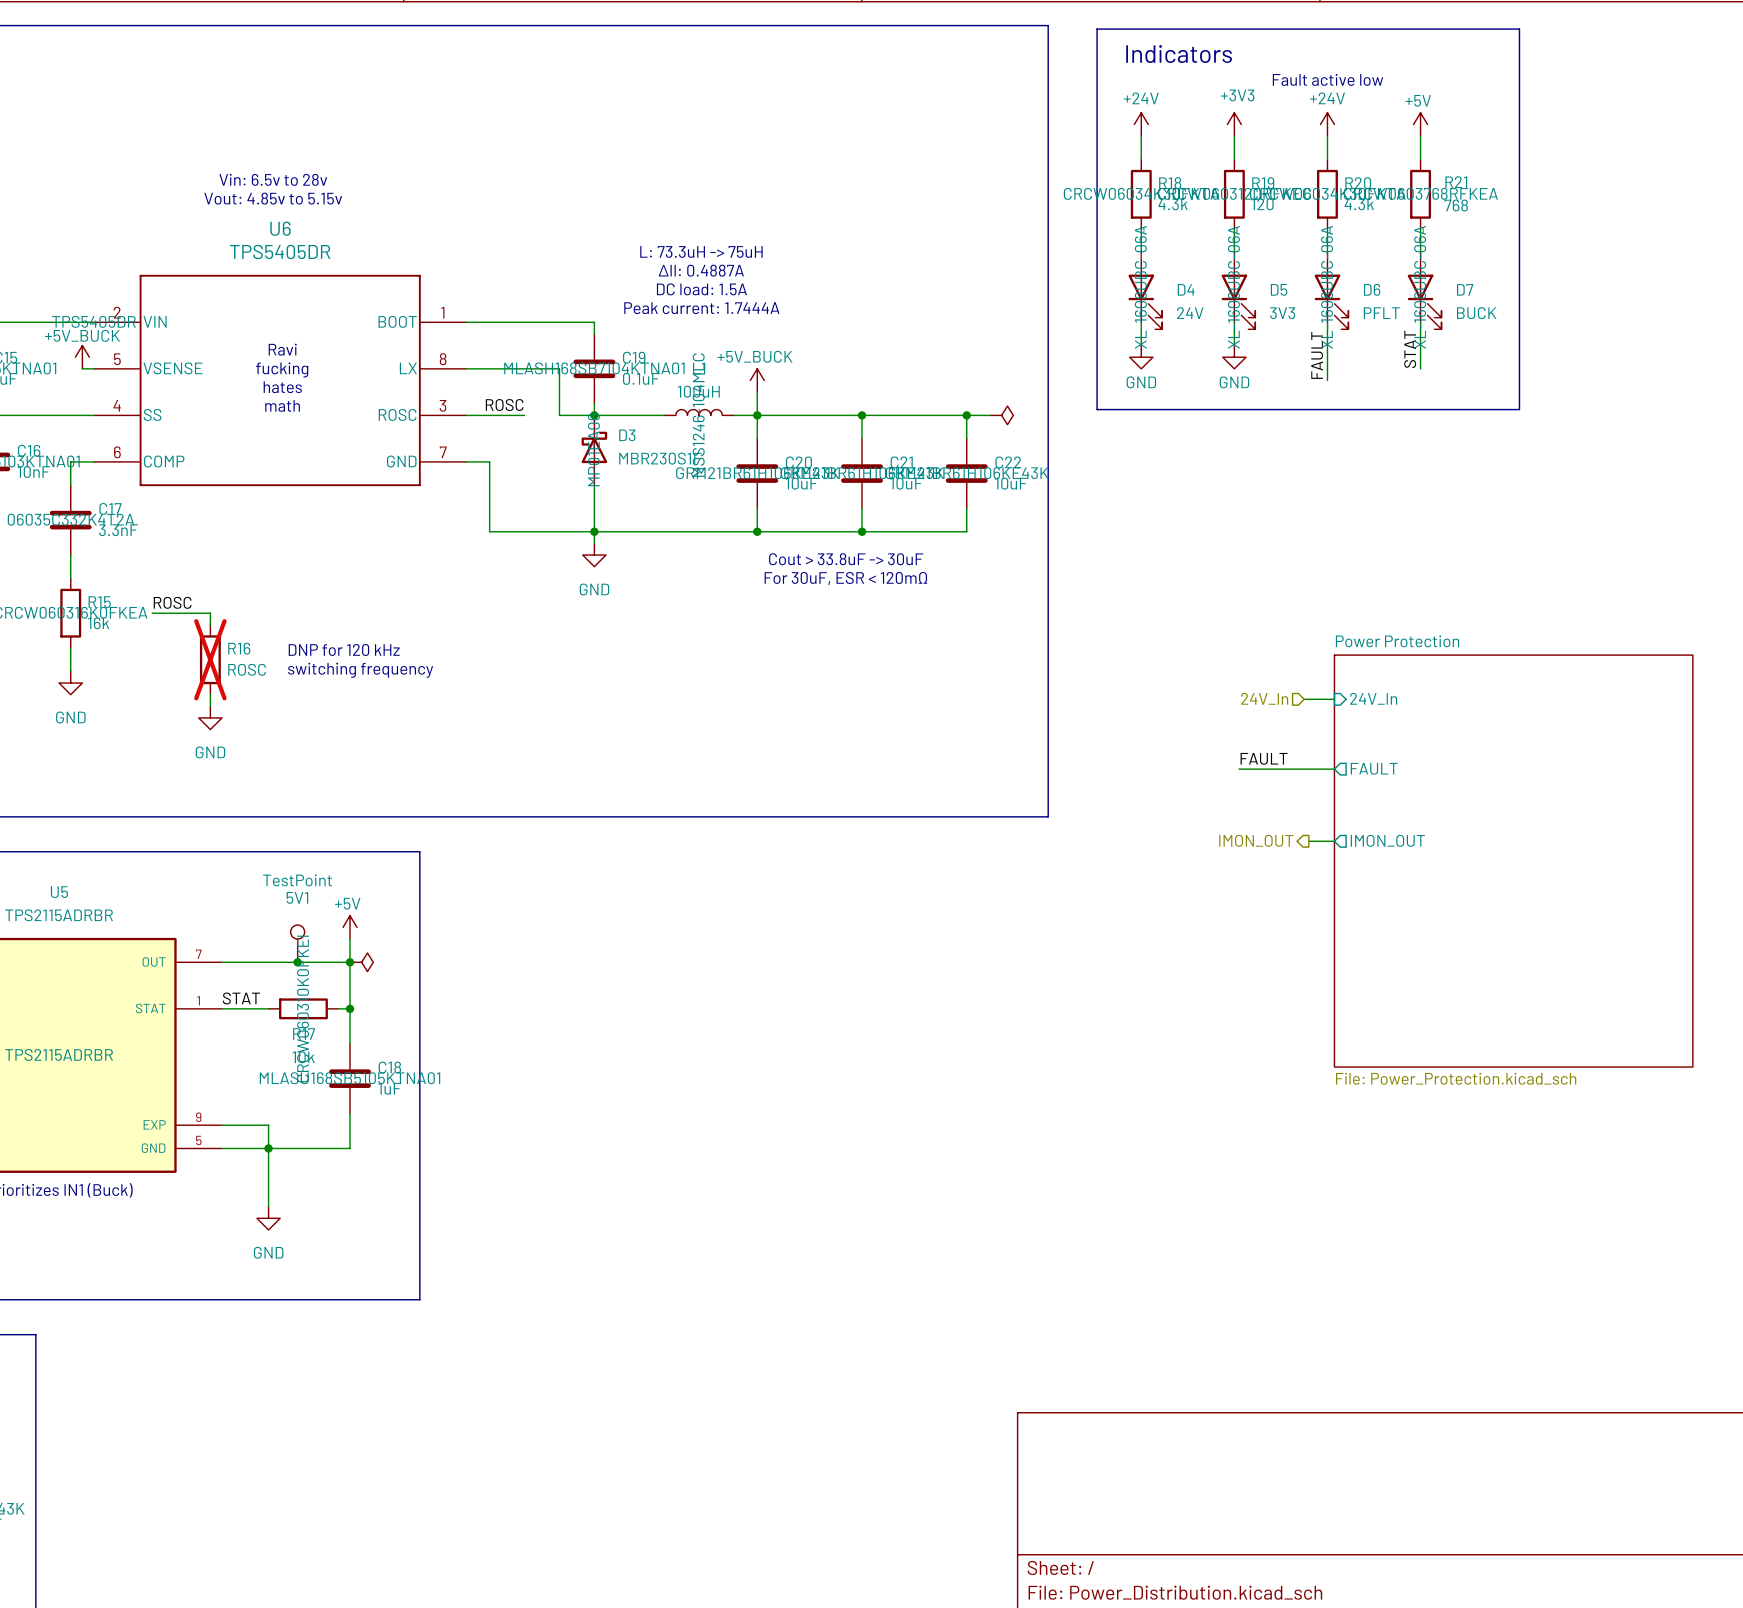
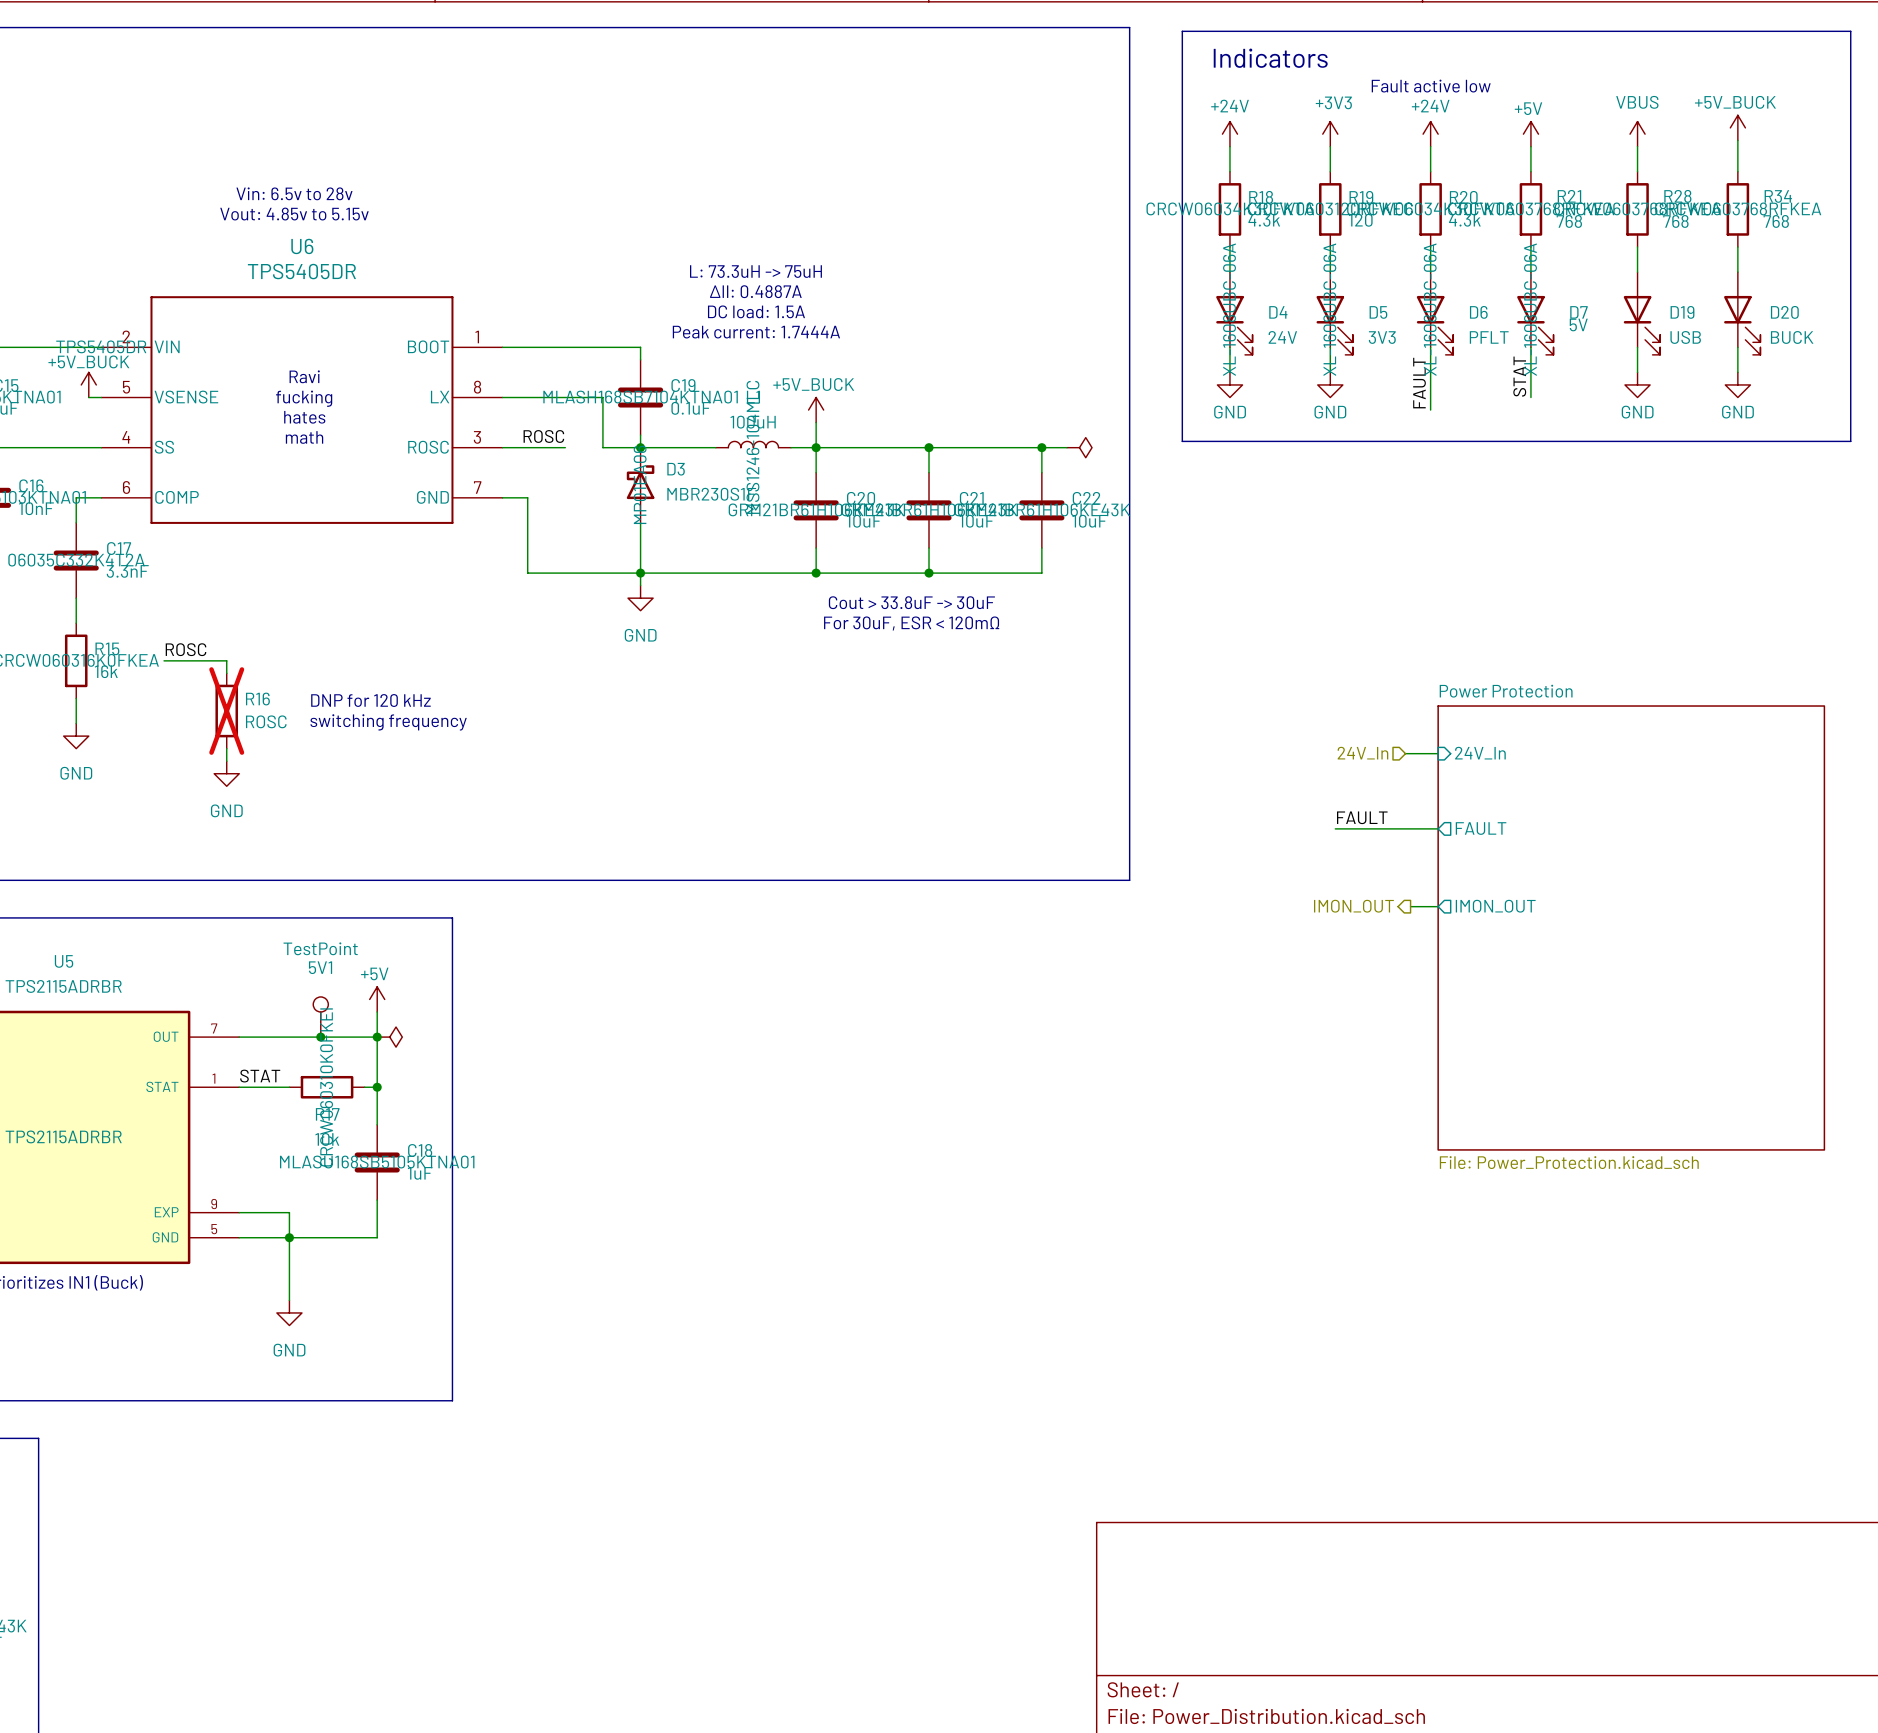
line: (1519, 29) (1519, 409) -> (1637, 31) (1850, 31) (1850, 441) (1637, 441)
power symbol: none -> +5V_BUCK (1737, 127)
power symbol: none -> VBUS (1637, 134)
wire: none -> (1737, 140) (1737, 171)
R28: none -> 768 (1637, 209)
R34: none -> 768 (1737, 209)
wire: none -> (1737, 247) (1737, 272)
D19: none -> USB (1641, 313)
D20: none -> BUCK (1742, 313)
D7 value: BUCK (1476, 313) -> 5V (1578, 324)
wire: none -> (1737, 347) (1737, 372)
power symbol: none -> GND (1637, 384)
power symbol: none -> GND (1737, 384)

